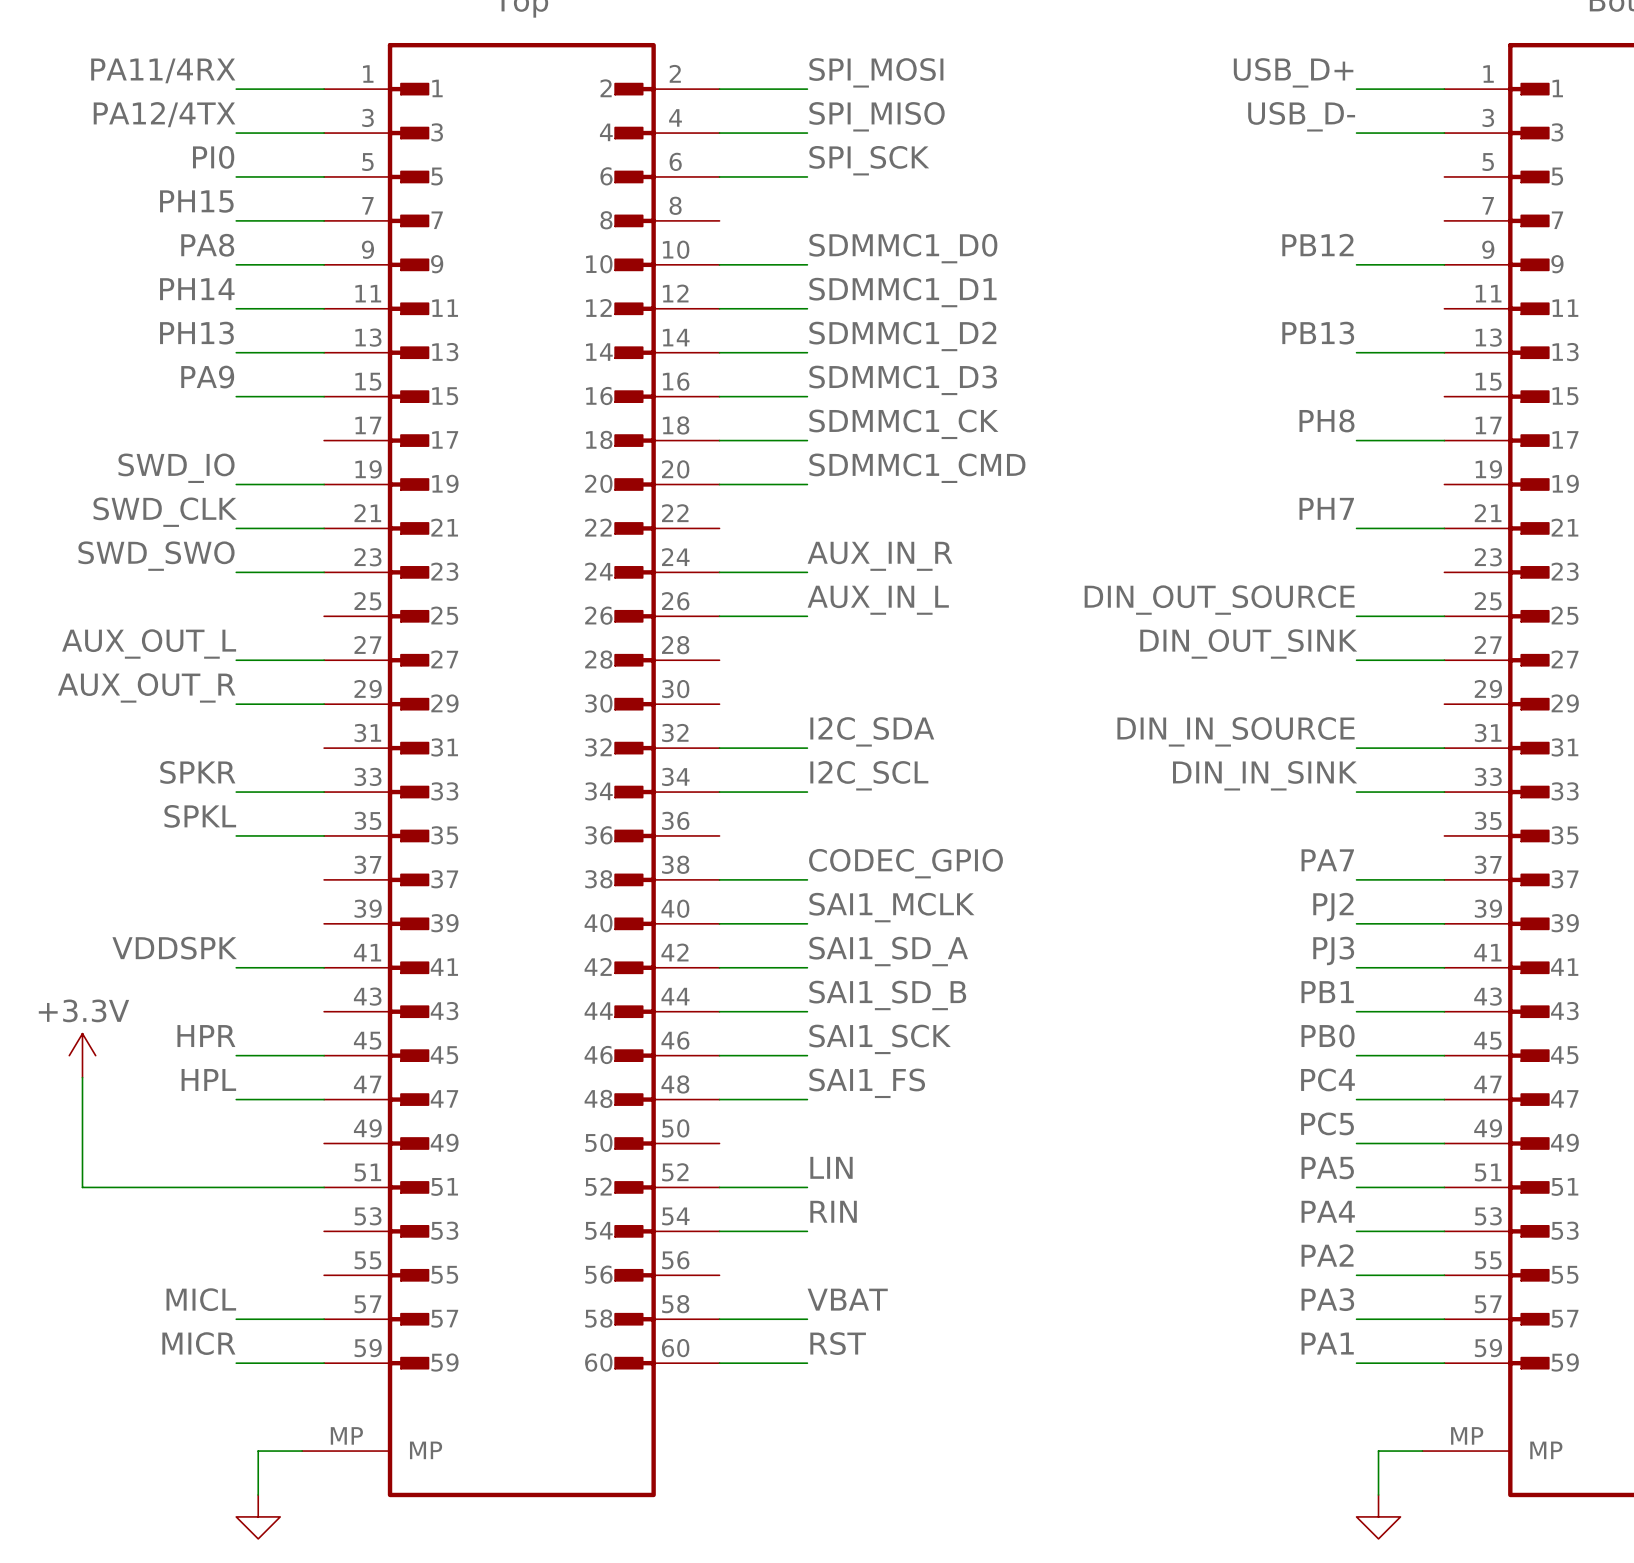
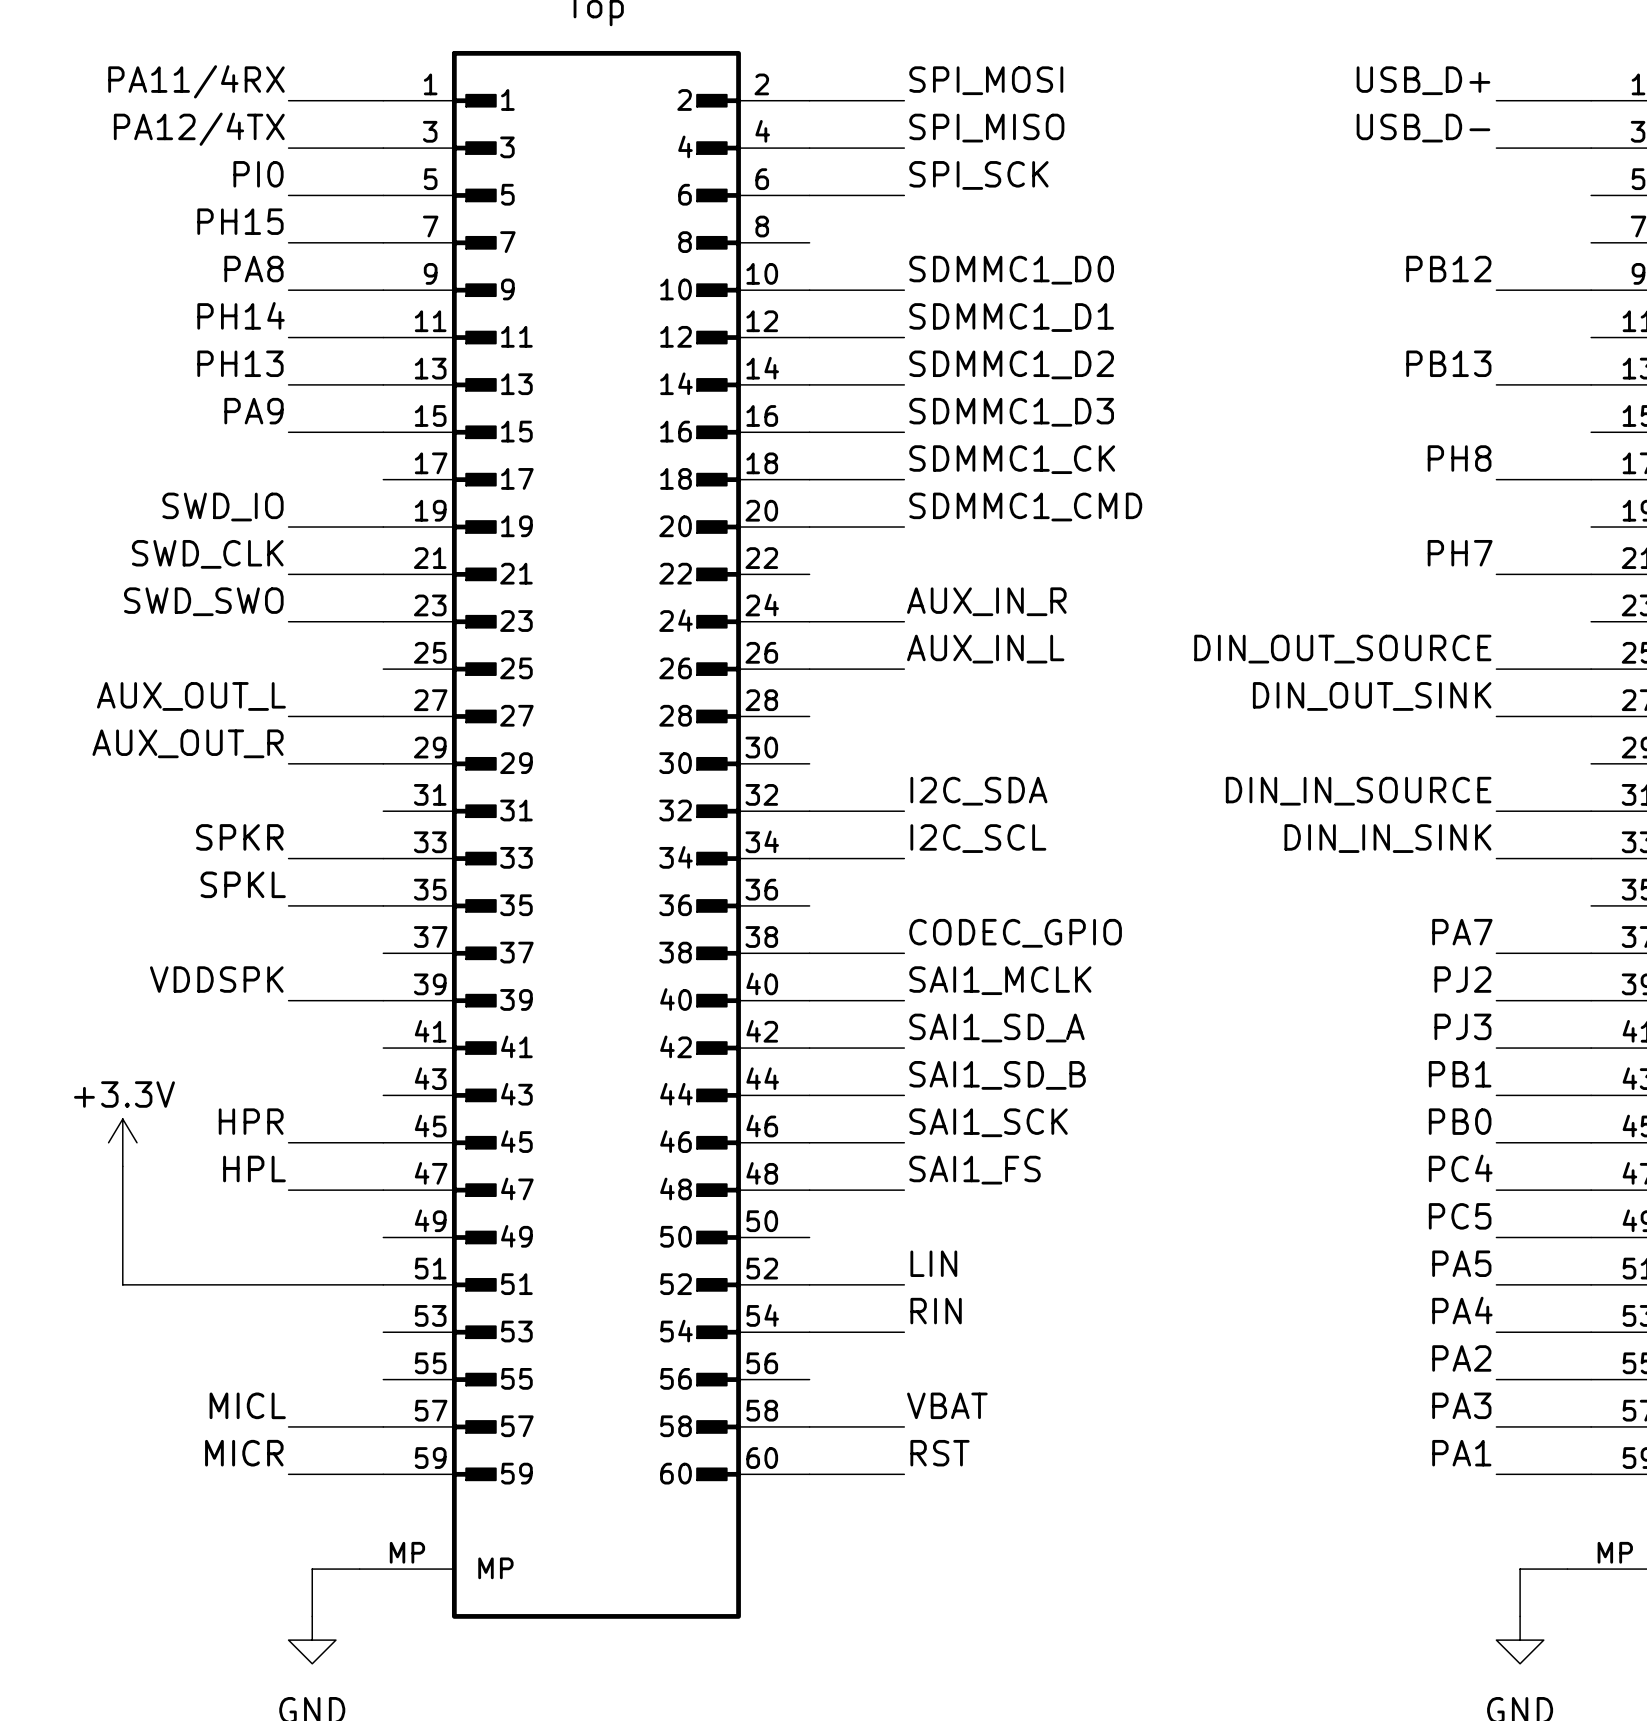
label position: VDDSPK (174, 948) -> VDDSPK (216, 979)
wire: (236, 967) (324, 967) -> (288, 1000) (383, 1000)

